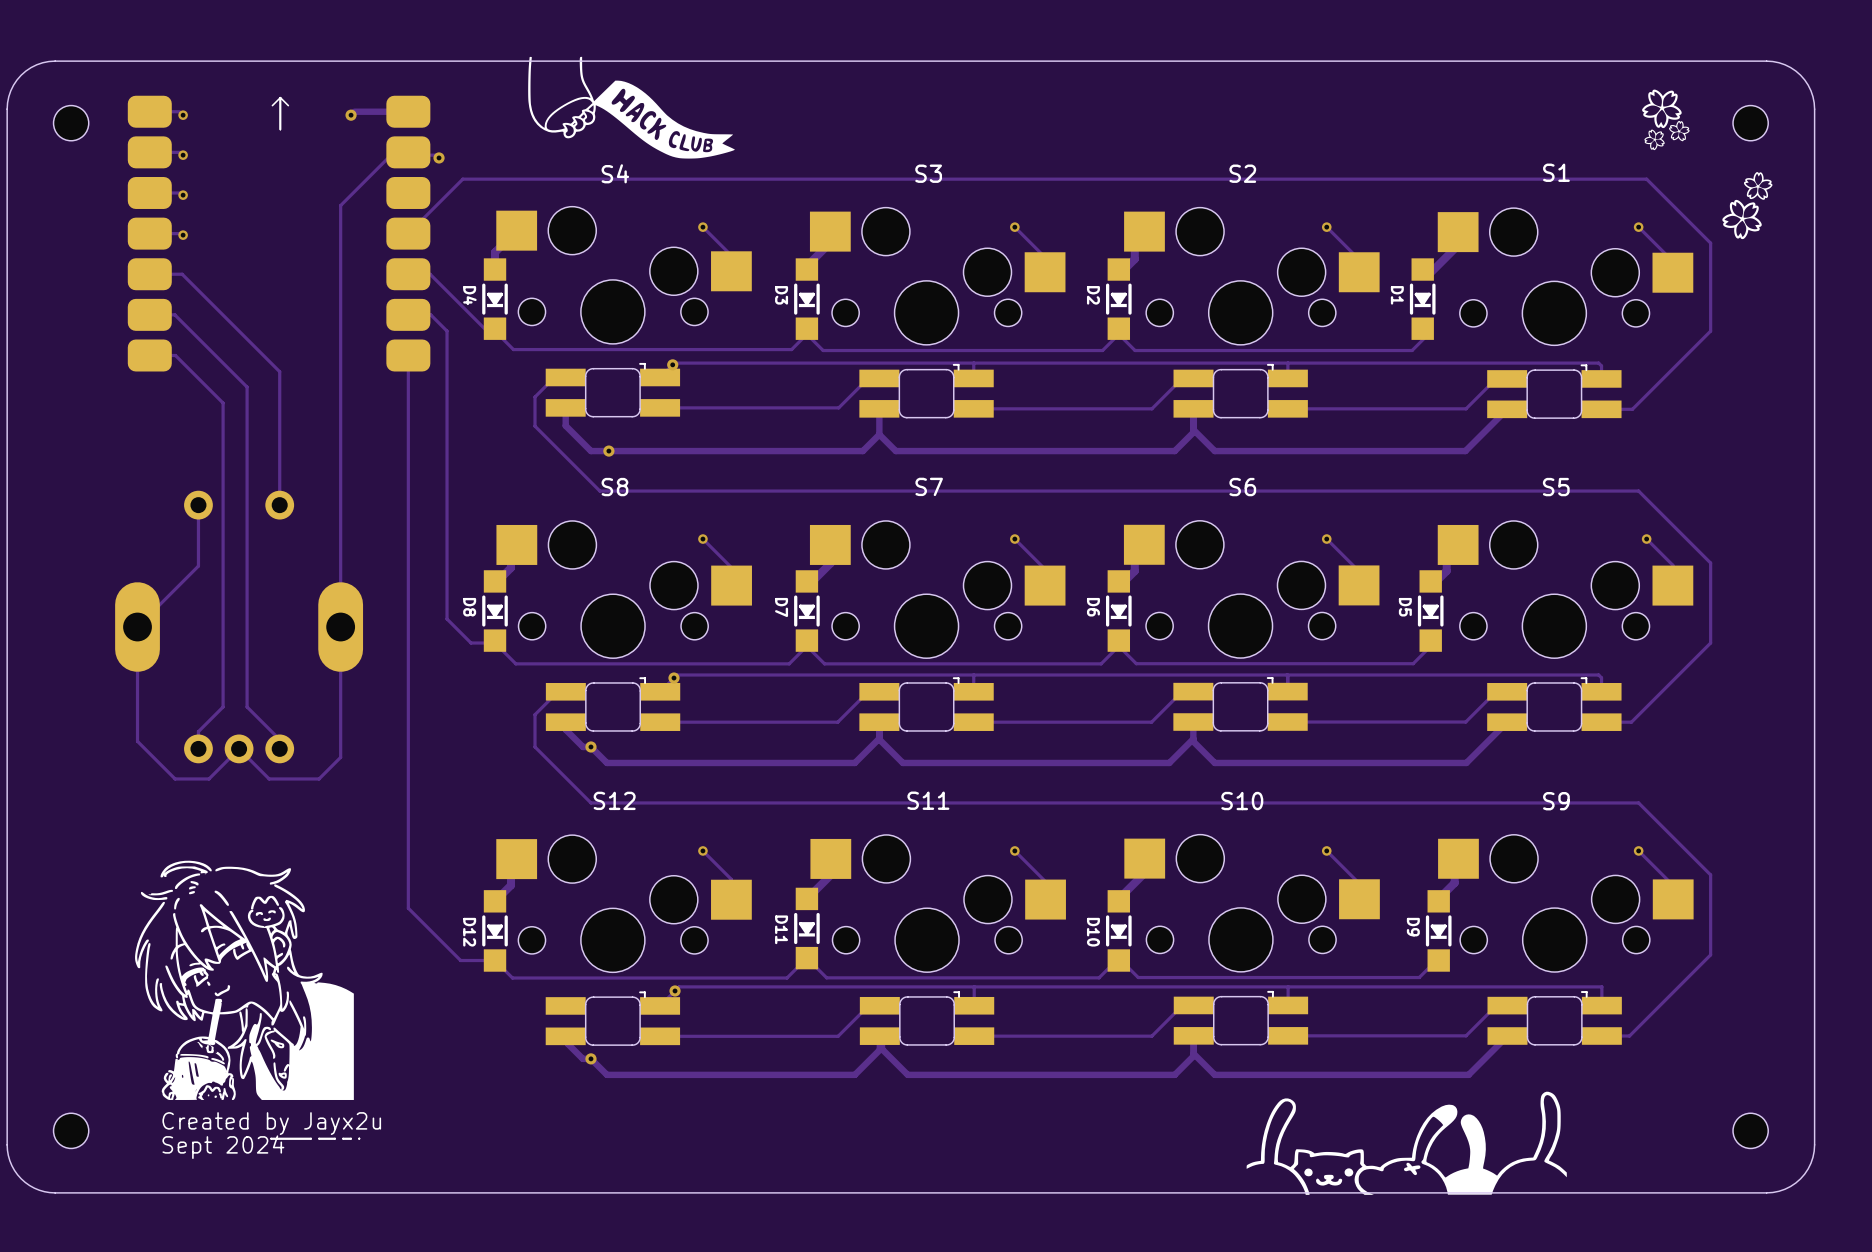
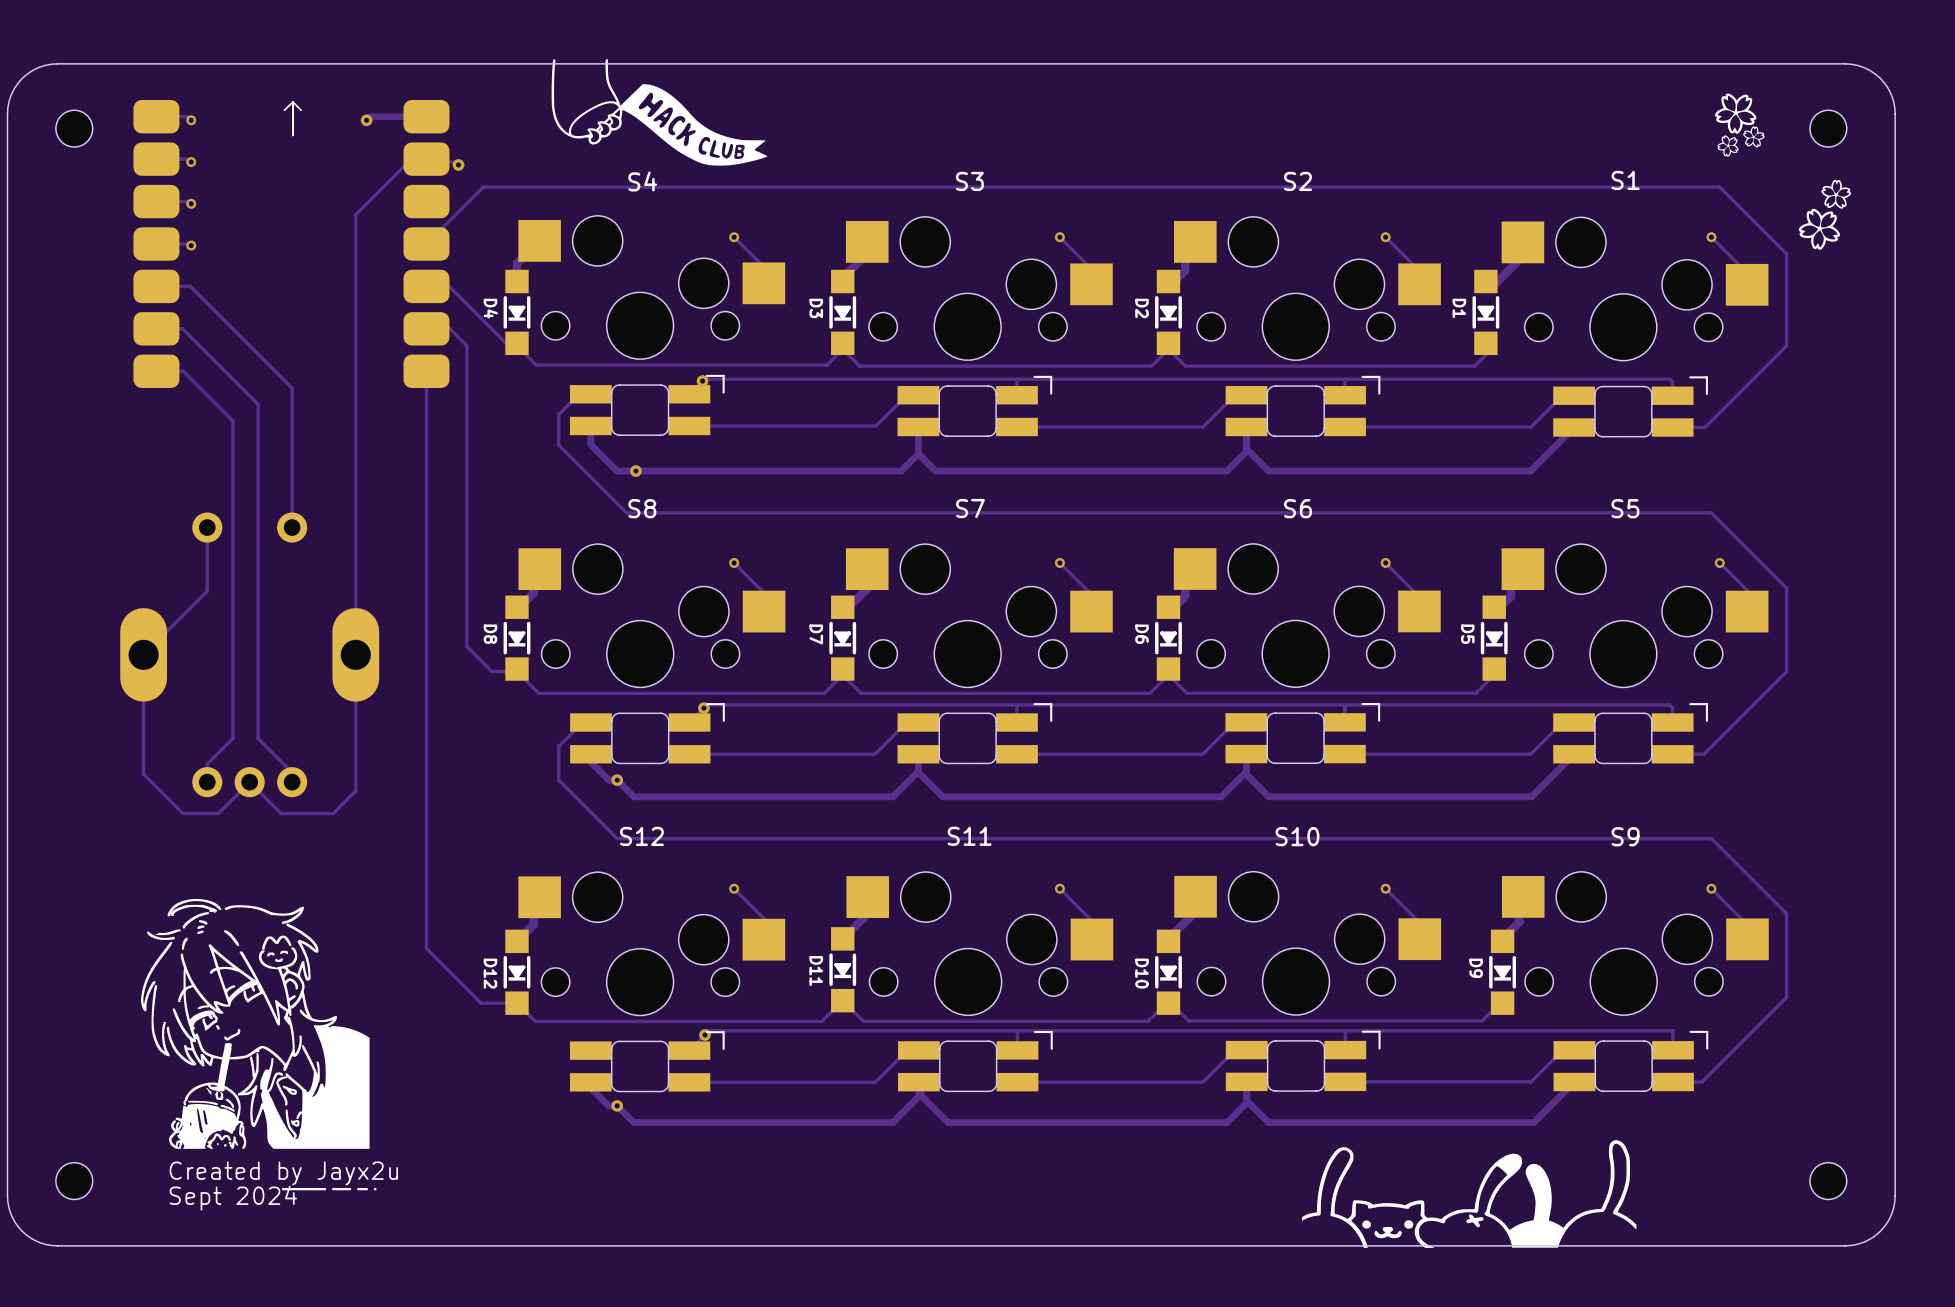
S1 footprint: [496, 206, 752, 418] -> [518, 215, 786, 436]
S2 footprint: [809, 207, 1066, 419] -> [845, 216, 1113, 437]
S3 footprint: [1124, 207, 1380, 419] -> [1174, 216, 1441, 437]
S4 footprint: [1437, 208, 1694, 419] -> [1501, 217, 1769, 438]
S5 footprint: [496, 520, 752, 732] -> [518, 544, 786, 764]
S6 footprint: [809, 520, 1066, 732] -> [845, 544, 1113, 764]
S7 footprint: [1123, 520, 1380, 732] -> [1173, 543, 1441, 764]
S8 footprint: [1437, 520, 1694, 732] -> [1501, 544, 1769, 764]
S10 footprint: [810, 834, 1066, 1046] -> [846, 872, 1114, 1092]
S11 footprint: [1124, 834, 1380, 1046] -> [1174, 871, 1442, 1092]
S12 footprint: [1438, 834, 1694, 1046] -> [1501, 871, 1769, 1092]
S9 footprint: [496, 835, 752, 1046] -> [518, 872, 786, 1092]

